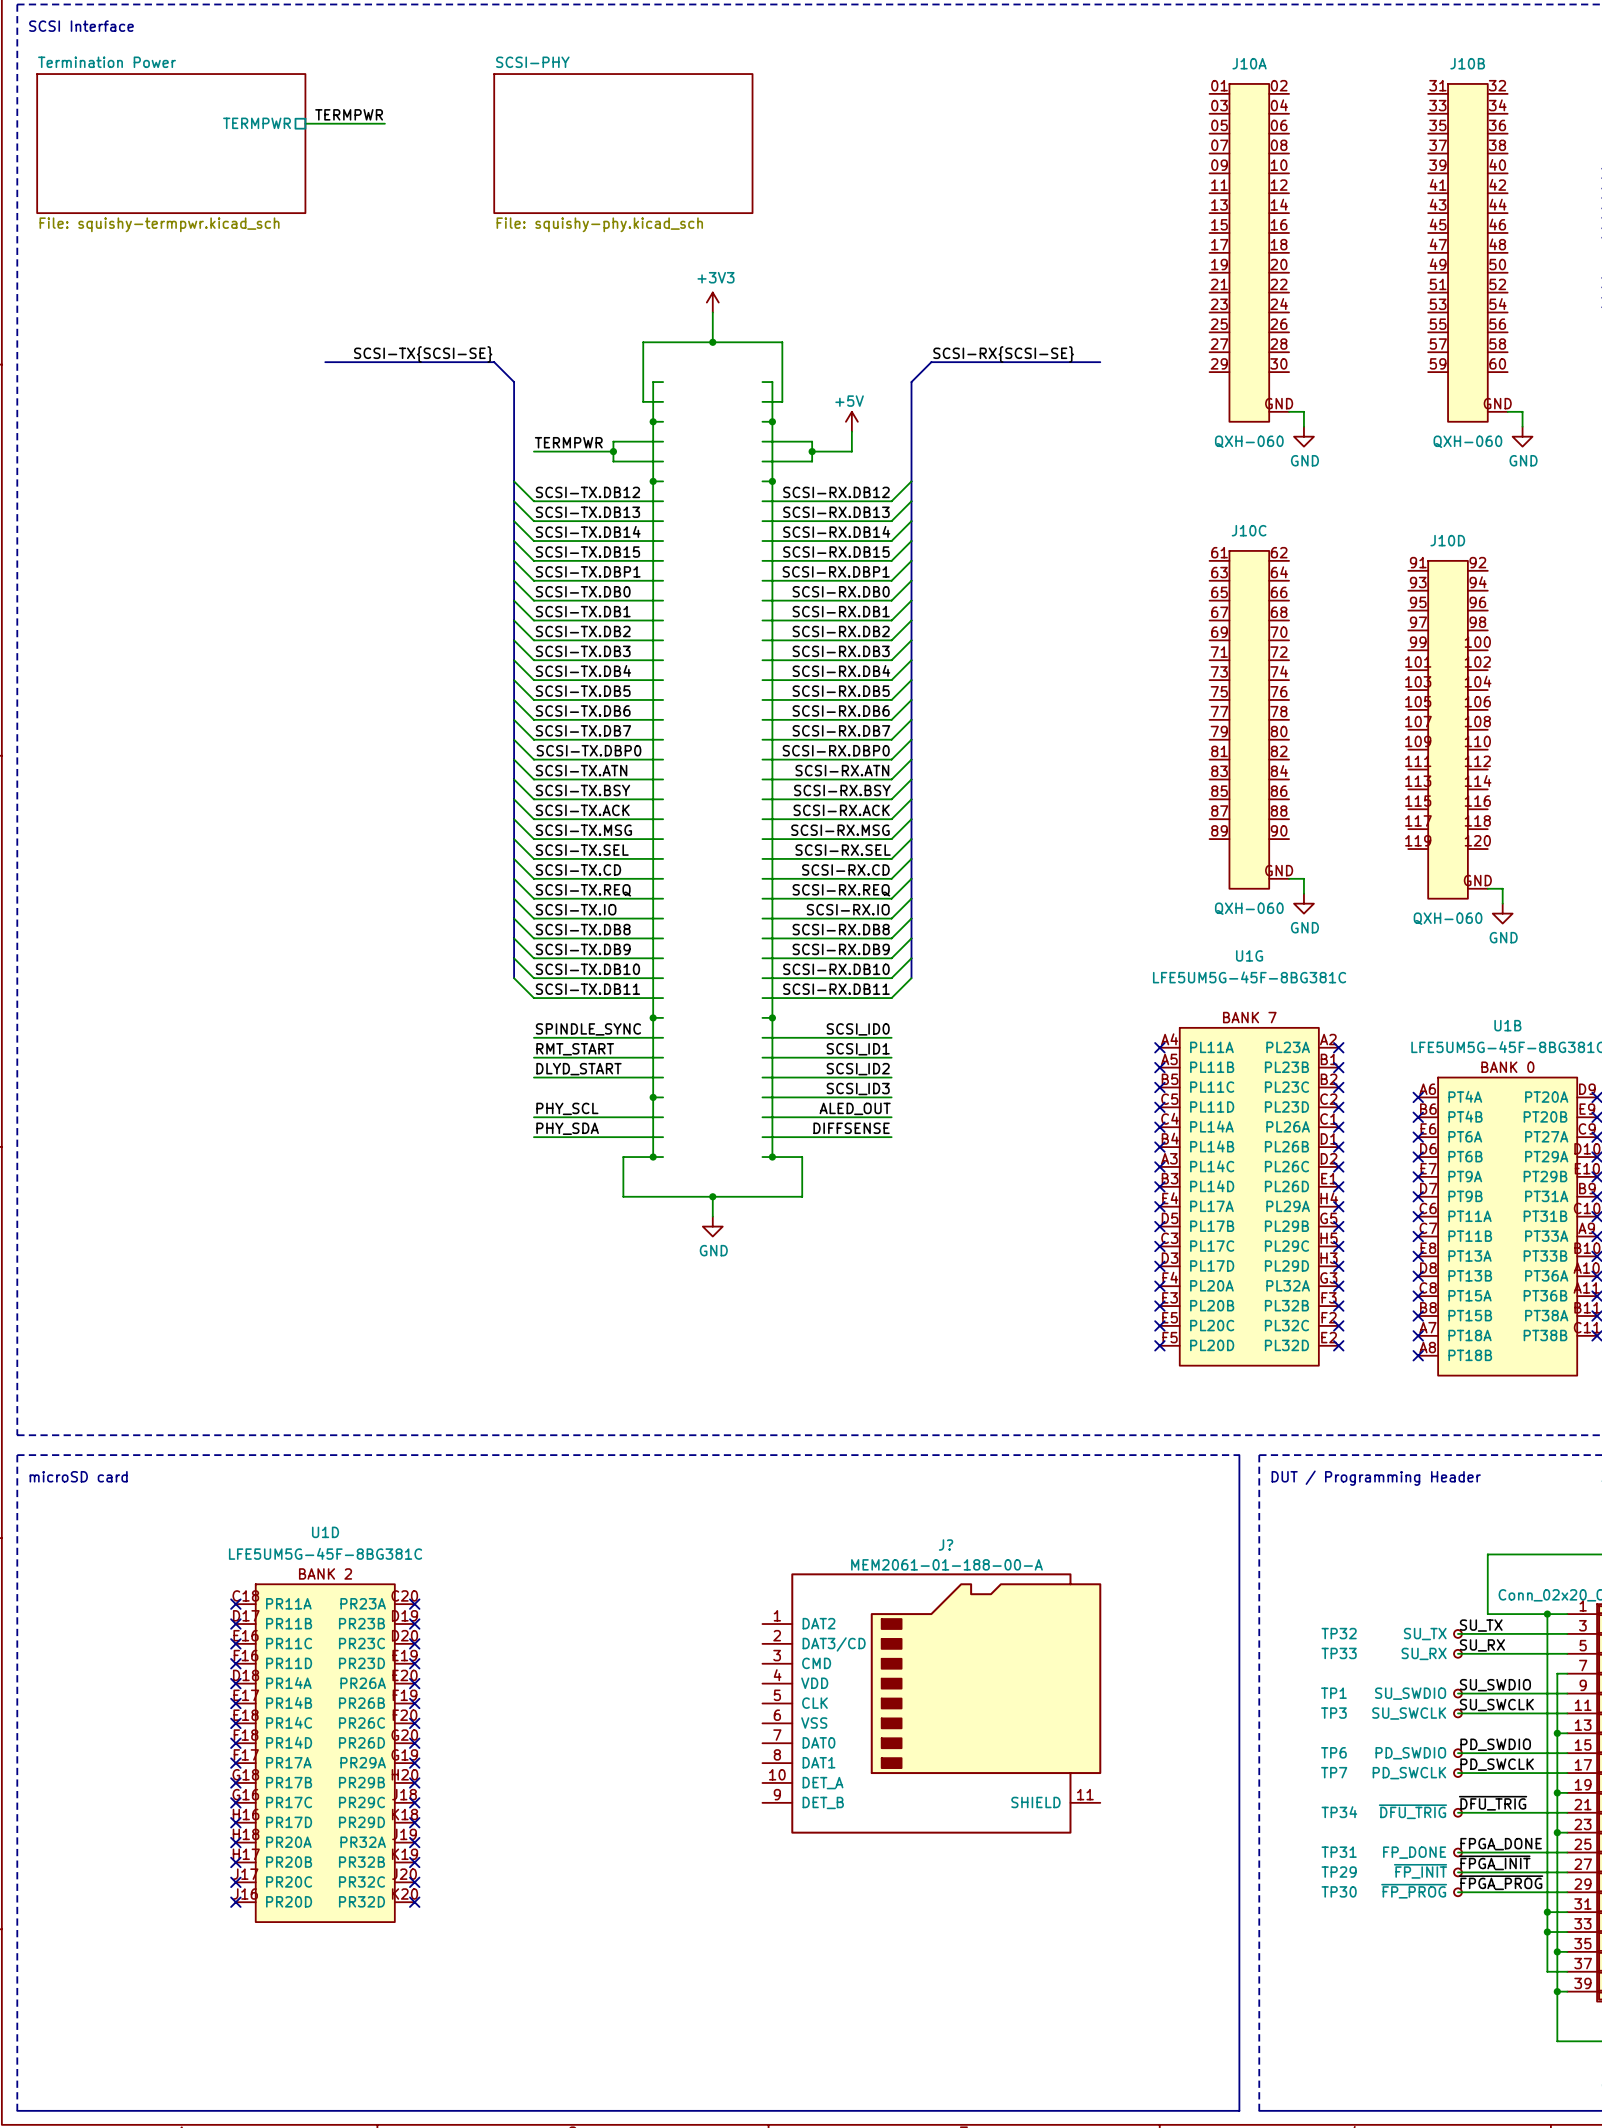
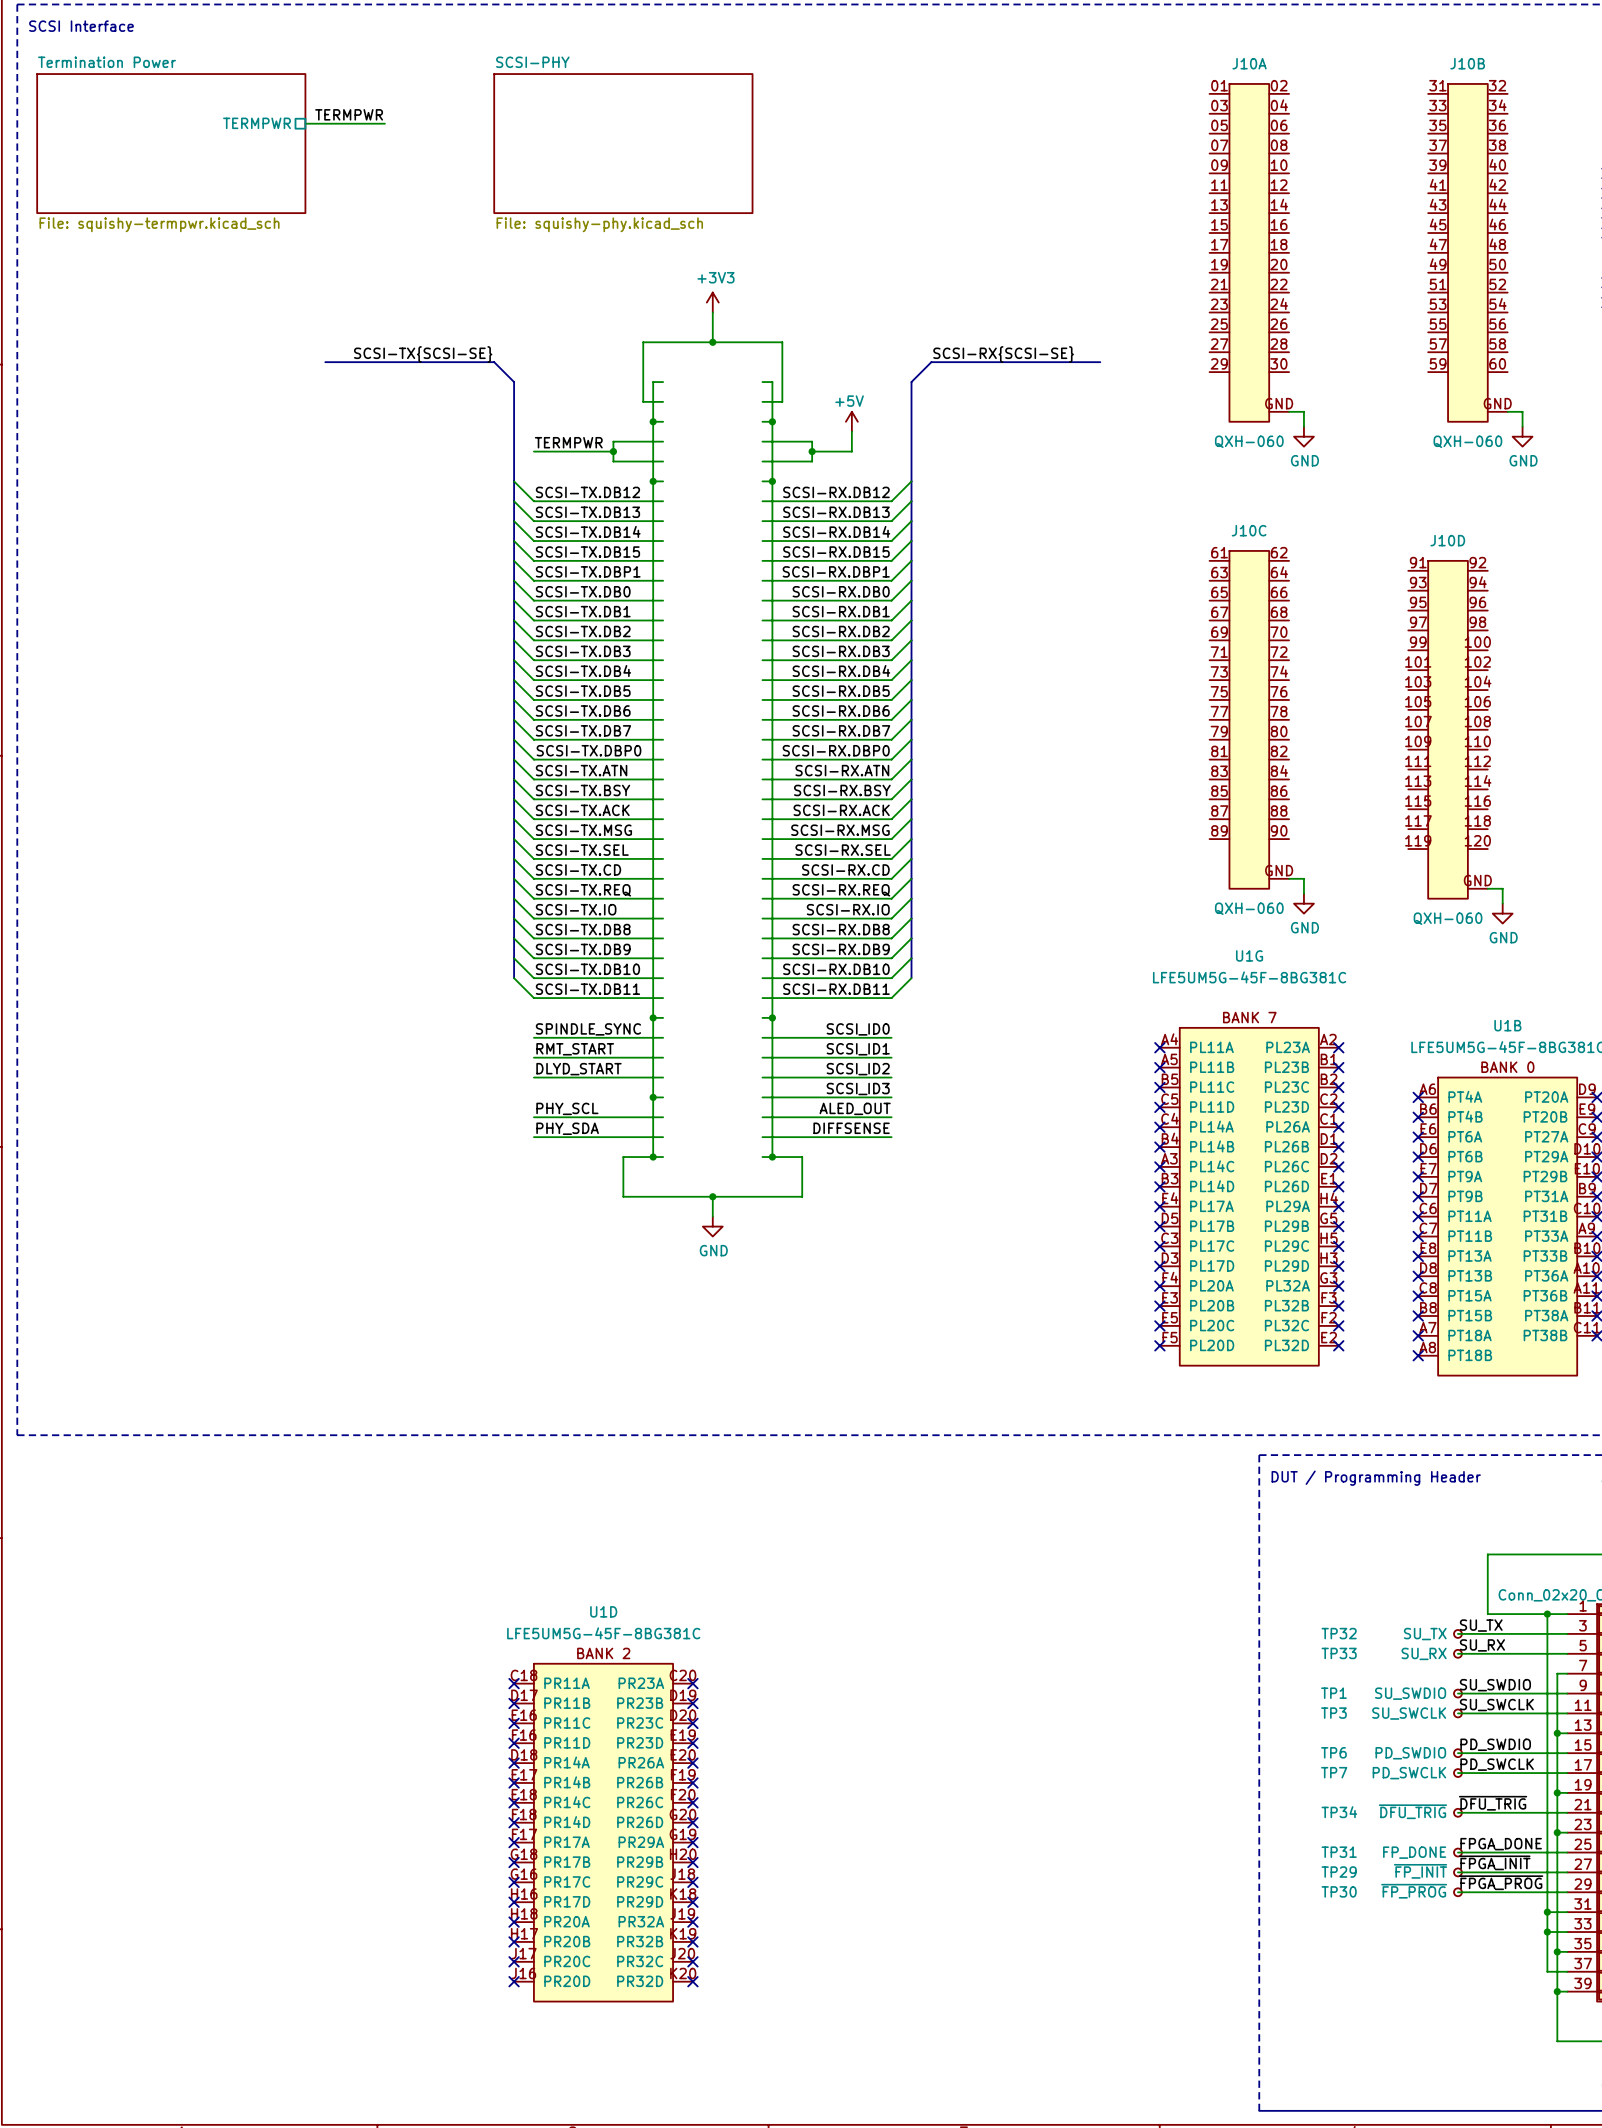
line: (17, 1455) (17, 2110) (1239, 2110) (1239, 1455) (17, 1455) -> none
text: microSD card (78, 1476) -> none
no-connect mark: (235, 1604) -> none
no-connect mark: (414, 1604) -> none
no-connect mark: (235, 1624) -> none
no-connect mark: (414, 1624) -> none
no-connect mark: (235, 1643) -> none
no-connect mark: (414, 1643) -> none
no-connect mark: (235, 1663) -> none
no-connect mark: (414, 1663) -> none
no-connect mark: (235, 1683) -> none
no-connect mark: (414, 1683) -> none
no-connect mark: none -> (514, 1683)
no-connect mark: none -> (692, 1683)
no-connect mark: (235, 1703) -> none
no-connect mark: (414, 1703) -> none
no-connect mark: none -> (514, 1703)
no-connect mark: none -> (692, 1703)
J?: MEM2061-01-188-00-A (931, 1703) -> none
no-connect mark: (235, 1723) -> none
no-connect mark: (414, 1723) -> none
no-connect mark: none -> (514, 1723)
no-connect mark: none -> (692, 1723)
no-connect mark: (235, 1743) -> none
no-connect mark: (414, 1743) -> none
no-connect mark: none -> (514, 1743)
no-connect mark: none -> (692, 1743)
U1D position: (325, 1753) -> (603, 1832)
no-connect mark: (235, 1763) -> none
no-connect mark: (414, 1763) -> none
no-connect mark: none -> (514, 1763)
no-connect mark: none -> (692, 1763)
no-connect mark: (235, 1782) -> none
no-connect mark: (414, 1782) -> none
no-connect mark: none -> (514, 1782)
no-connect mark: none -> (692, 1782)
no-connect mark: (235, 1802) -> none
no-connect mark: (414, 1802) -> none
no-connect mark: none -> (514, 1802)
no-connect mark: none -> (692, 1802)
no-connect mark: (235, 1822) -> none
no-connect mark: (414, 1822) -> none
no-connect mark: none -> (514, 1822)
no-connect mark: none -> (692, 1822)
no-connect mark: (235, 1842) -> none
no-connect mark: (414, 1842) -> none
no-connect mark: none -> (514, 1842)
no-connect mark: none -> (692, 1842)
no-connect mark: (235, 1862) -> none
no-connect mark: (414, 1862) -> none
no-connect mark: none -> (514, 1862)
no-connect mark: none -> (692, 1862)
no-connect mark: (235, 1882) -> none
no-connect mark: (414, 1882) -> none
no-connect mark: none -> (514, 1882)
no-connect mark: none -> (692, 1882)
no-connect mark: (235, 1902) -> none
no-connect mark: (414, 1902) -> none
no-connect mark: none -> (514, 1902)
no-connect mark: none -> (692, 1902)
no-connect mark: none -> (514, 1922)
no-connect mark: none -> (692, 1922)
no-connect mark: none -> (514, 1941)
no-connect mark: none -> (692, 1941)
no-connect mark: none -> (514, 1961)
no-connect mark: none -> (692, 1961)
no-connect mark: none -> (514, 1981)
no-connect mark: none -> (692, 1981)

